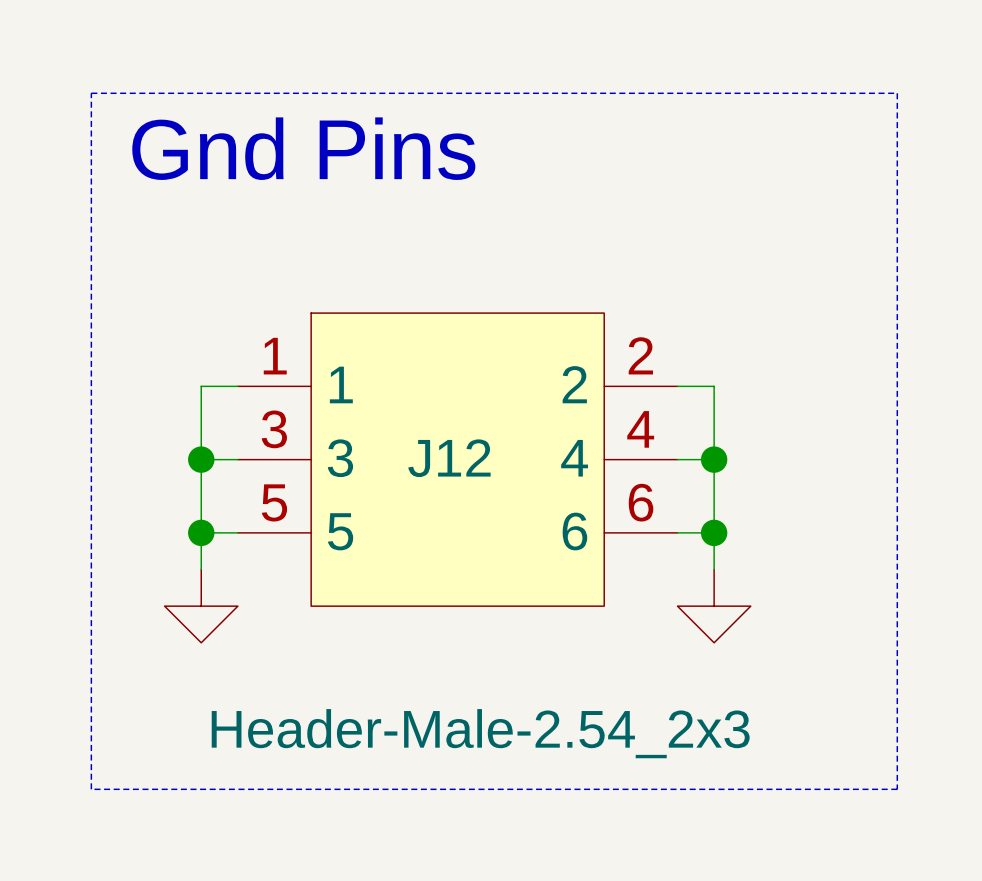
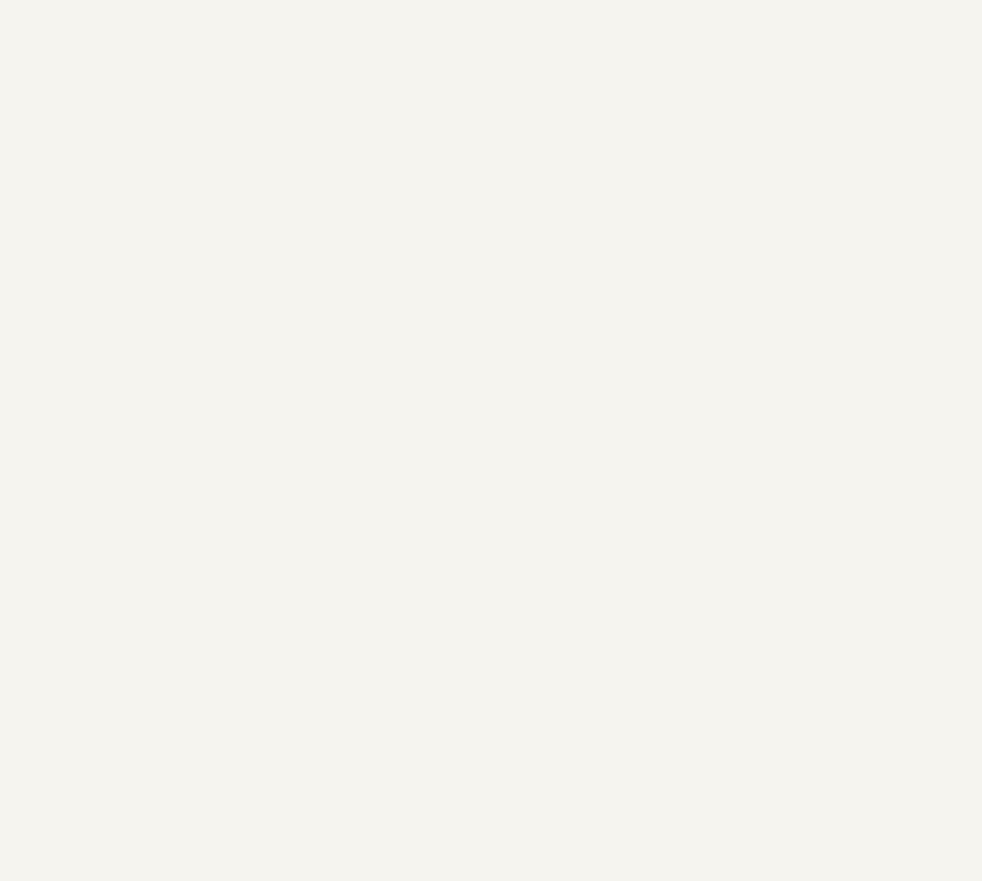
line: (91, 93) (897, 93) (897, 789) (91, 789) (91, 93) -> none
text: Gnd Pins (303, 148) -> none
wire: (237, 386) (201, 386) (201, 569) -> none
wire: (677, 386) (714, 386) (714, 569) -> none
wire: (201, 459) (237, 459) -> none
junction: (201, 459) -> none
J12: Header-Male-2.54_2x3 (457, 459) -> none
wire: (677, 459) (714, 459) -> none
junction: (714, 459) -> none
wire: (201, 532) (237, 532) -> none
junction: (201, 532) -> none
wire: (677, 532) (714, 532) -> none
junction: (714, 532) -> none
power symbol: (201, 606) -> none
power symbol: (714, 606) -> none

